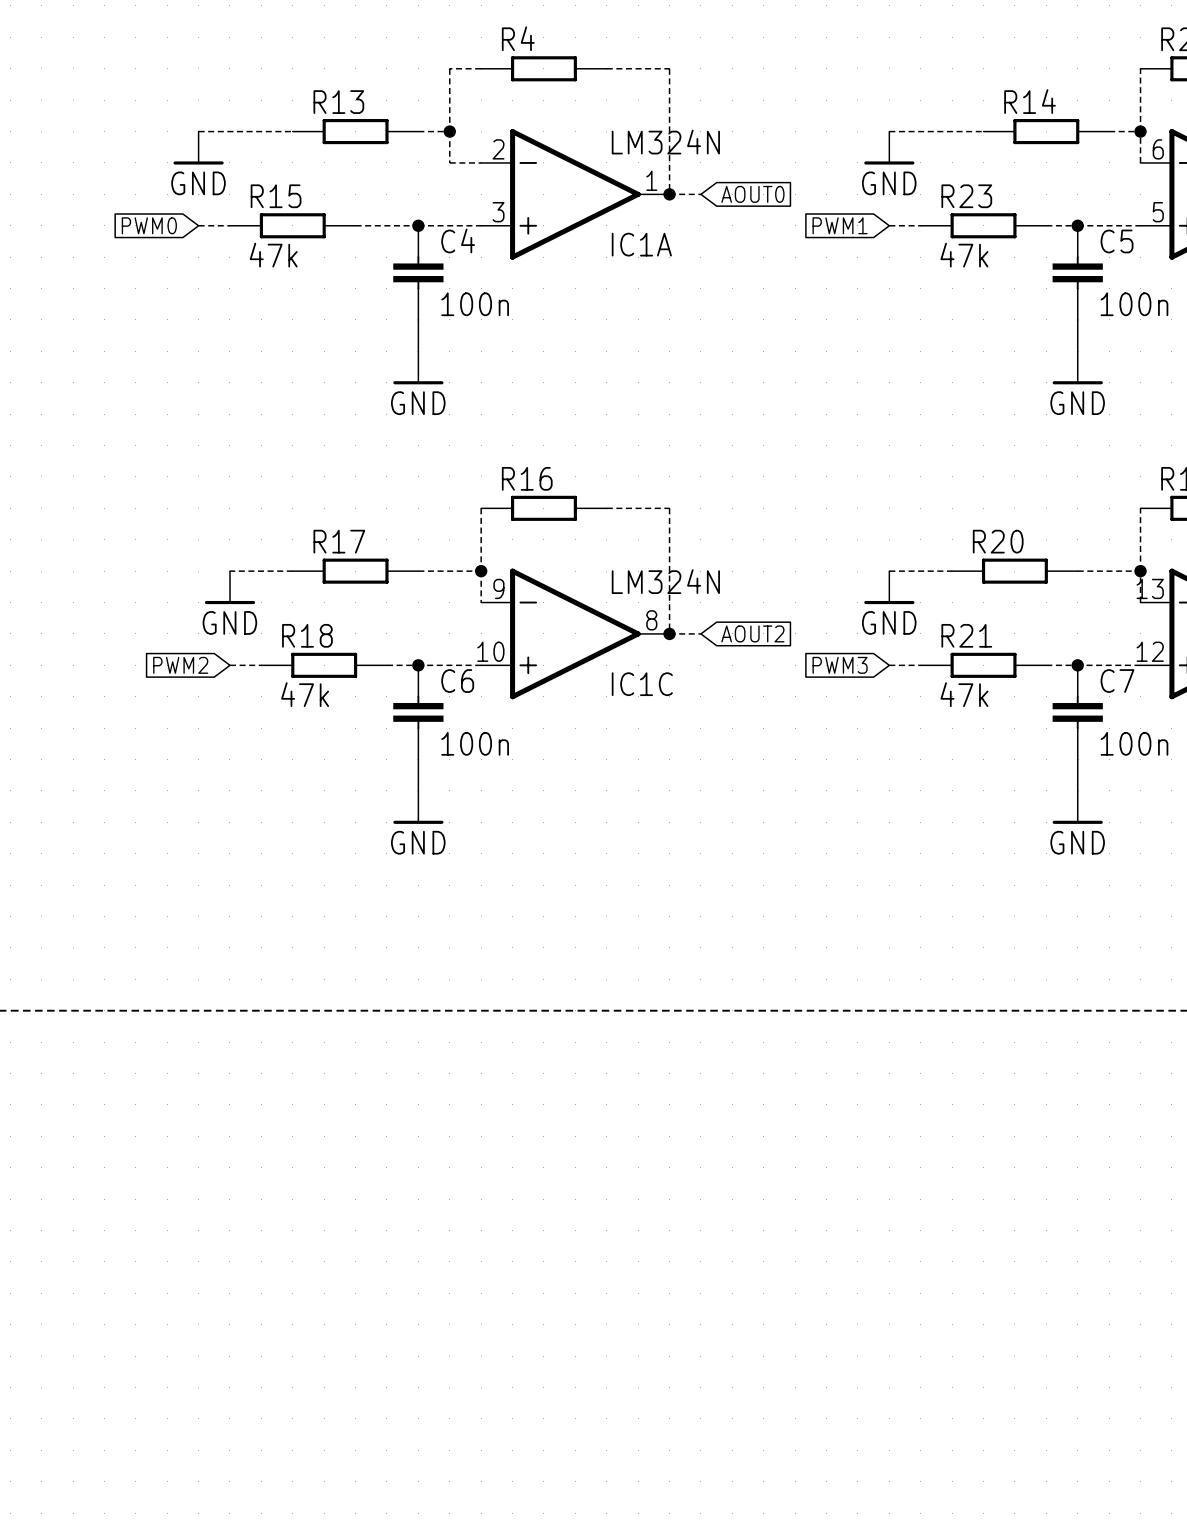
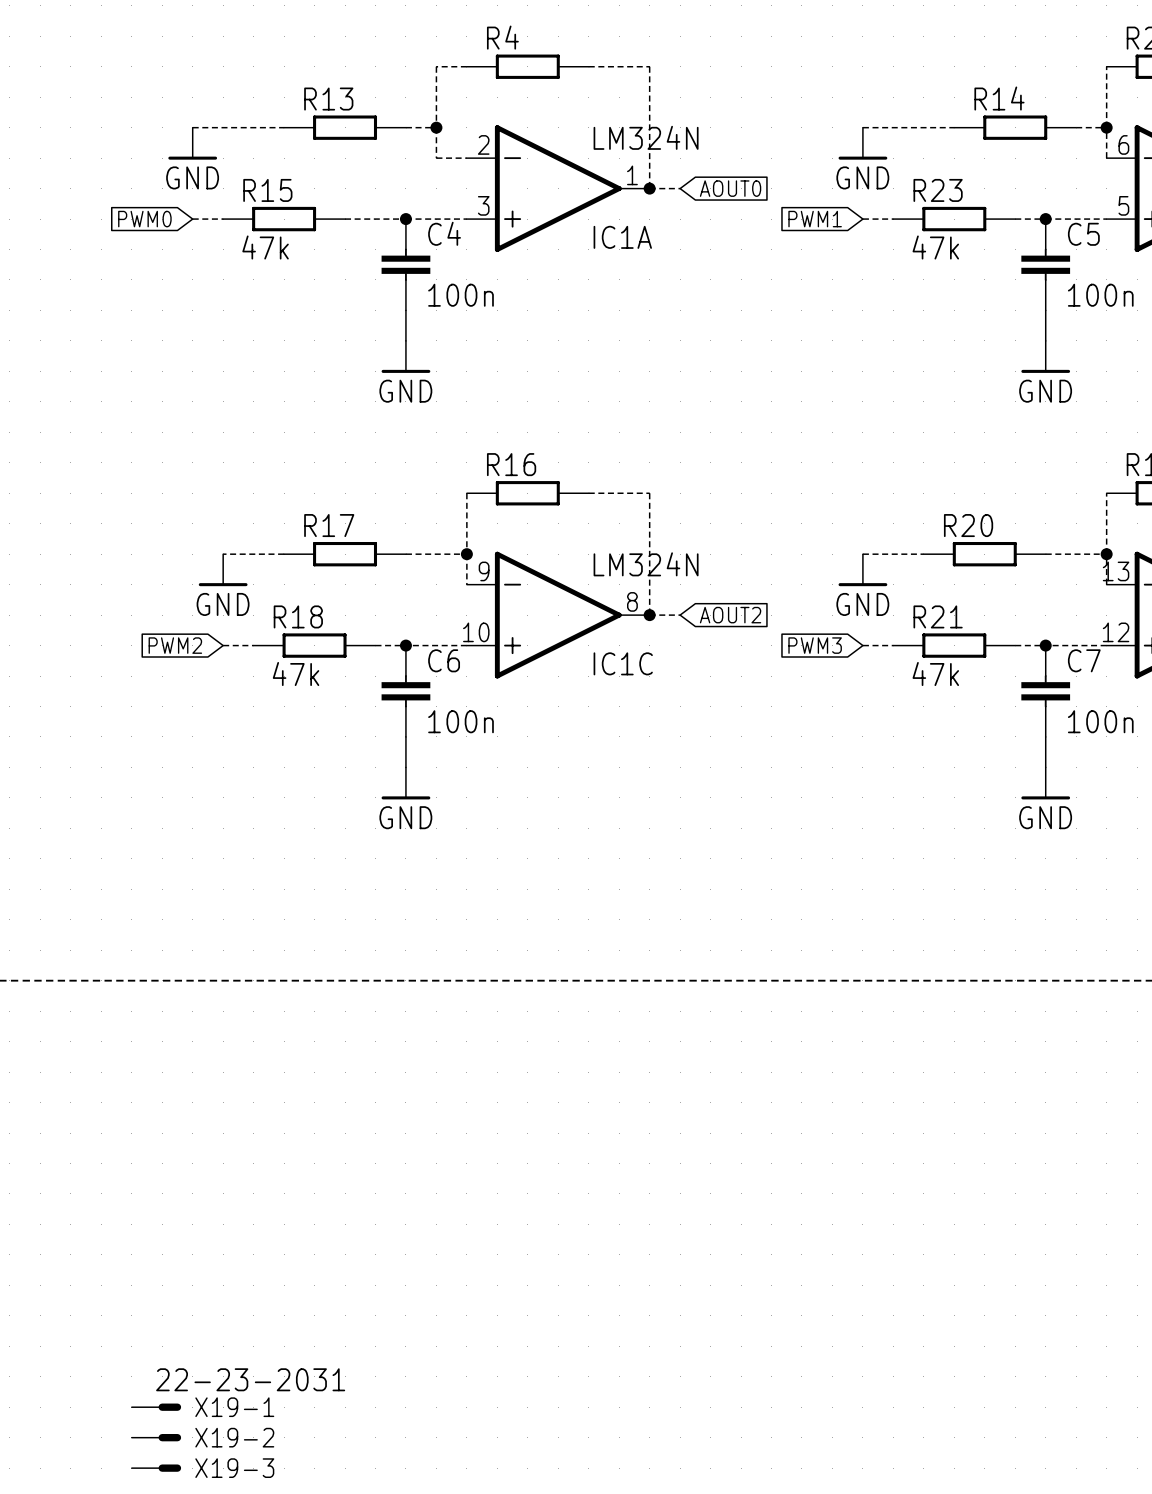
X19-1: none -> 22-23-2031 (156, 1407)
X19-2: none -> (156, 1437)
X19-3: none -> (156, 1468)

